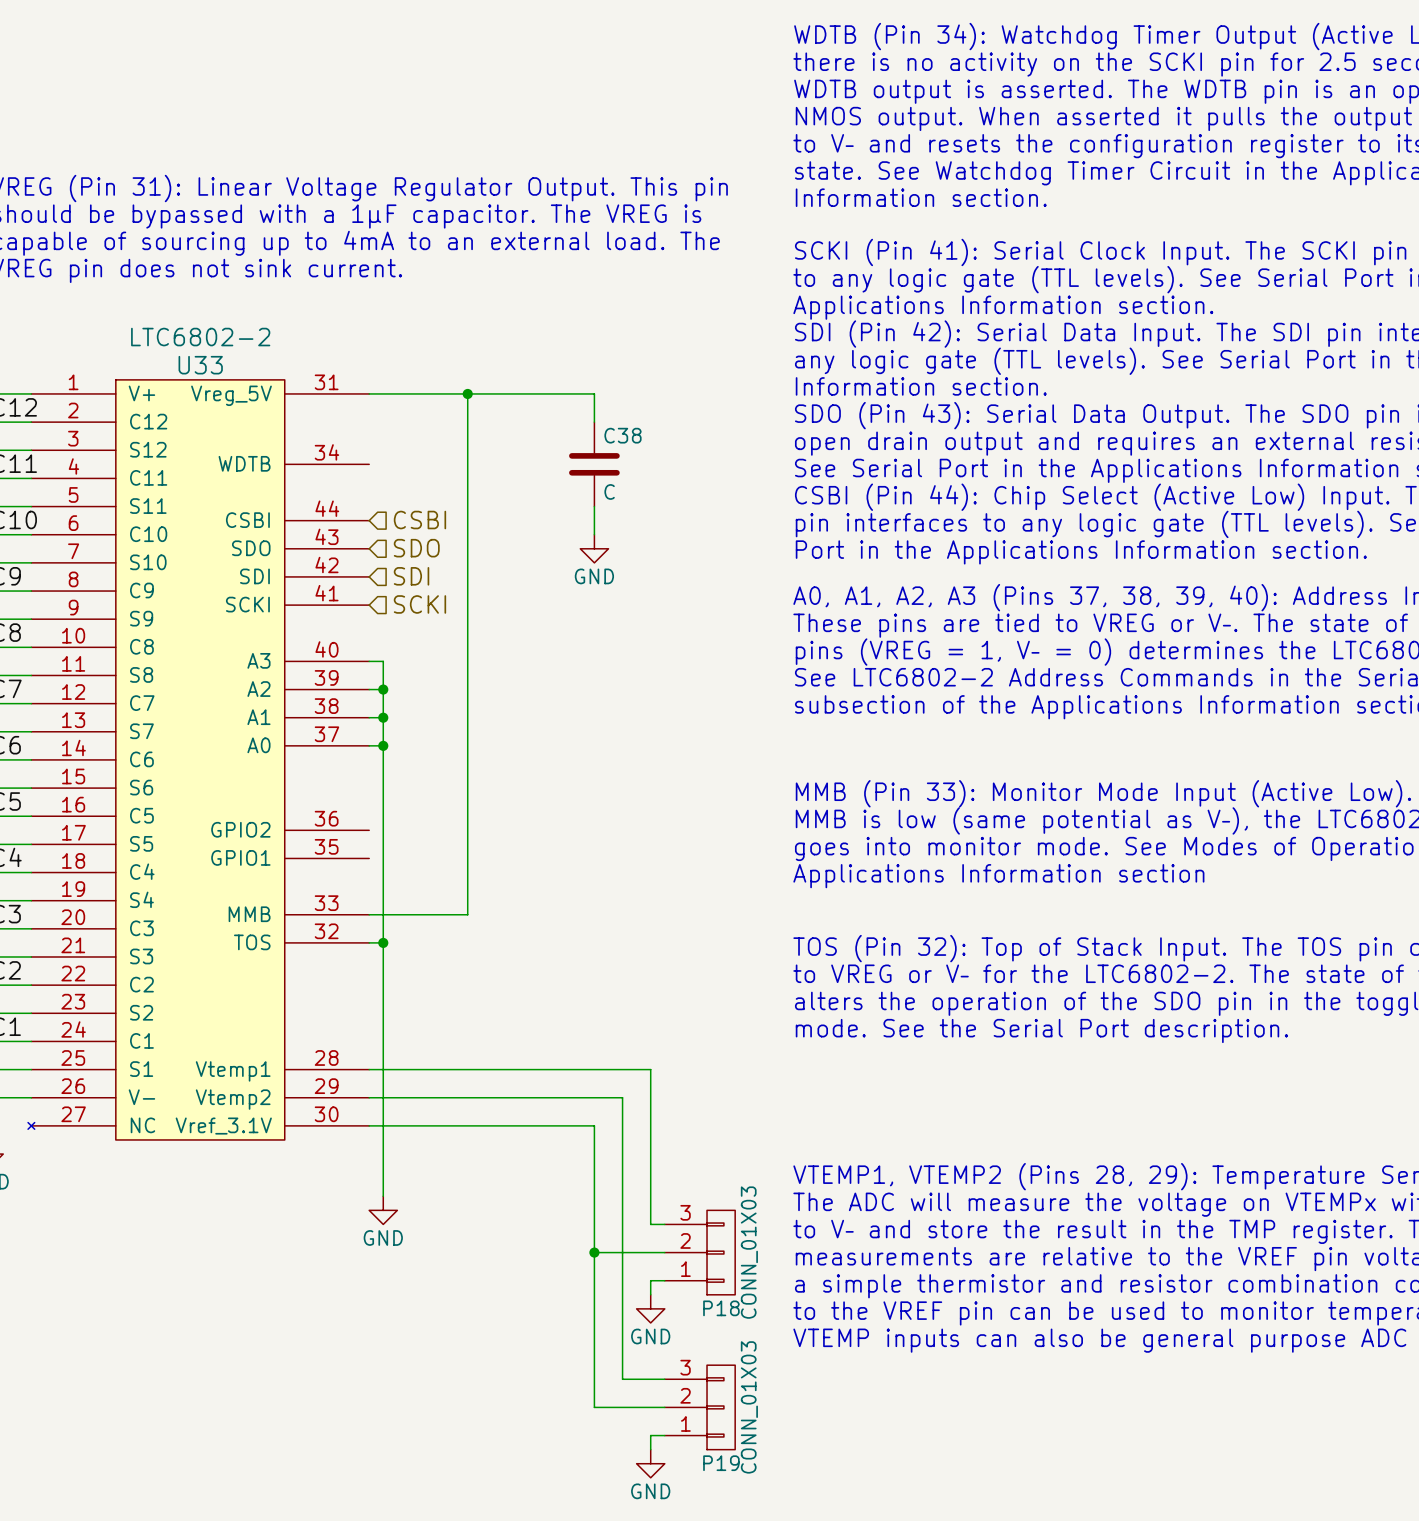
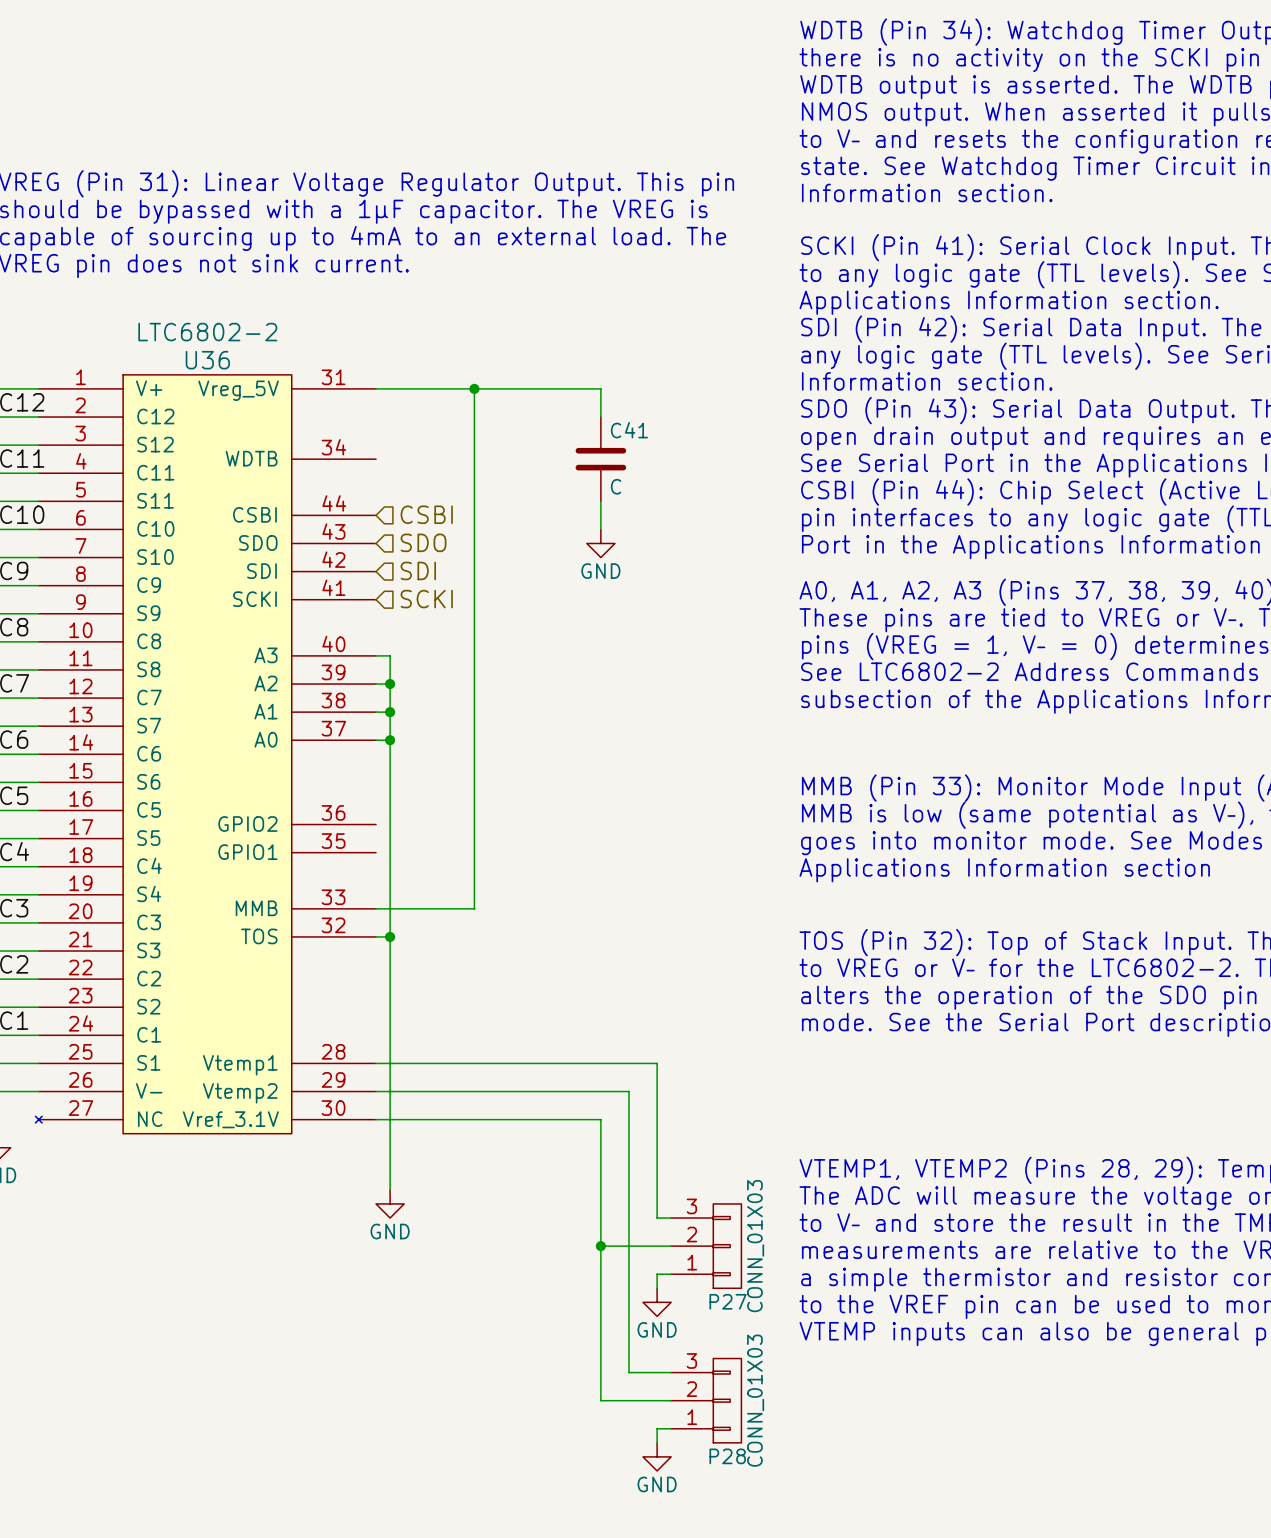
U33 name: U33 (200, 365) -> U36 (207, 360)
C38 name: C38 (623, 435) -> C41 (629, 430)
P18 name: P18 (721, 1308) -> P27 (728, 1301)
P19 name: P19 (721, 1463) -> P28 (727, 1456)

